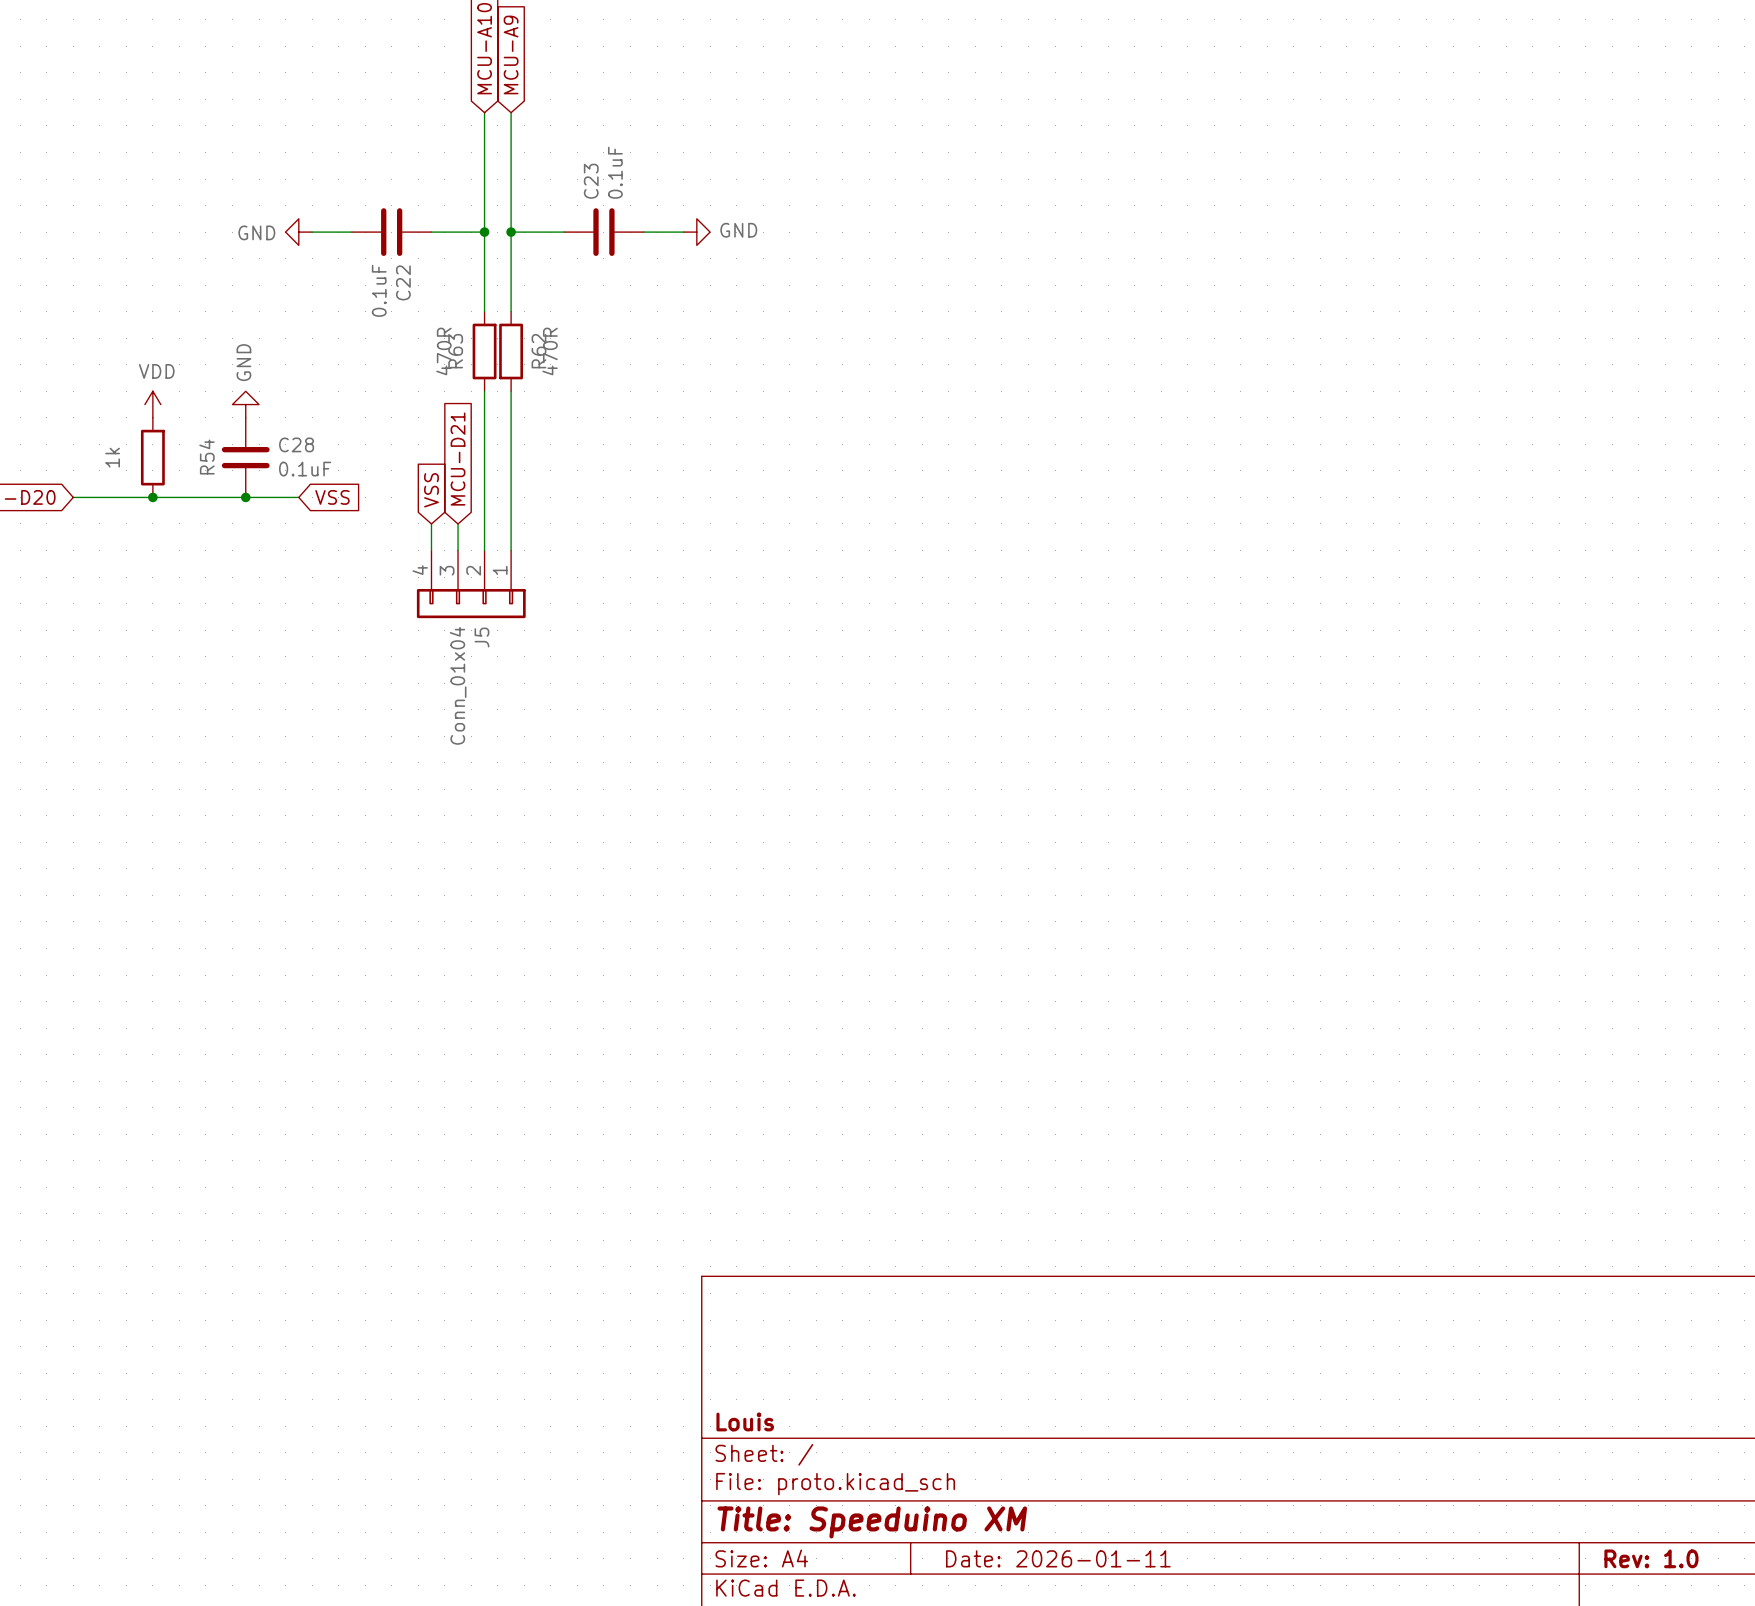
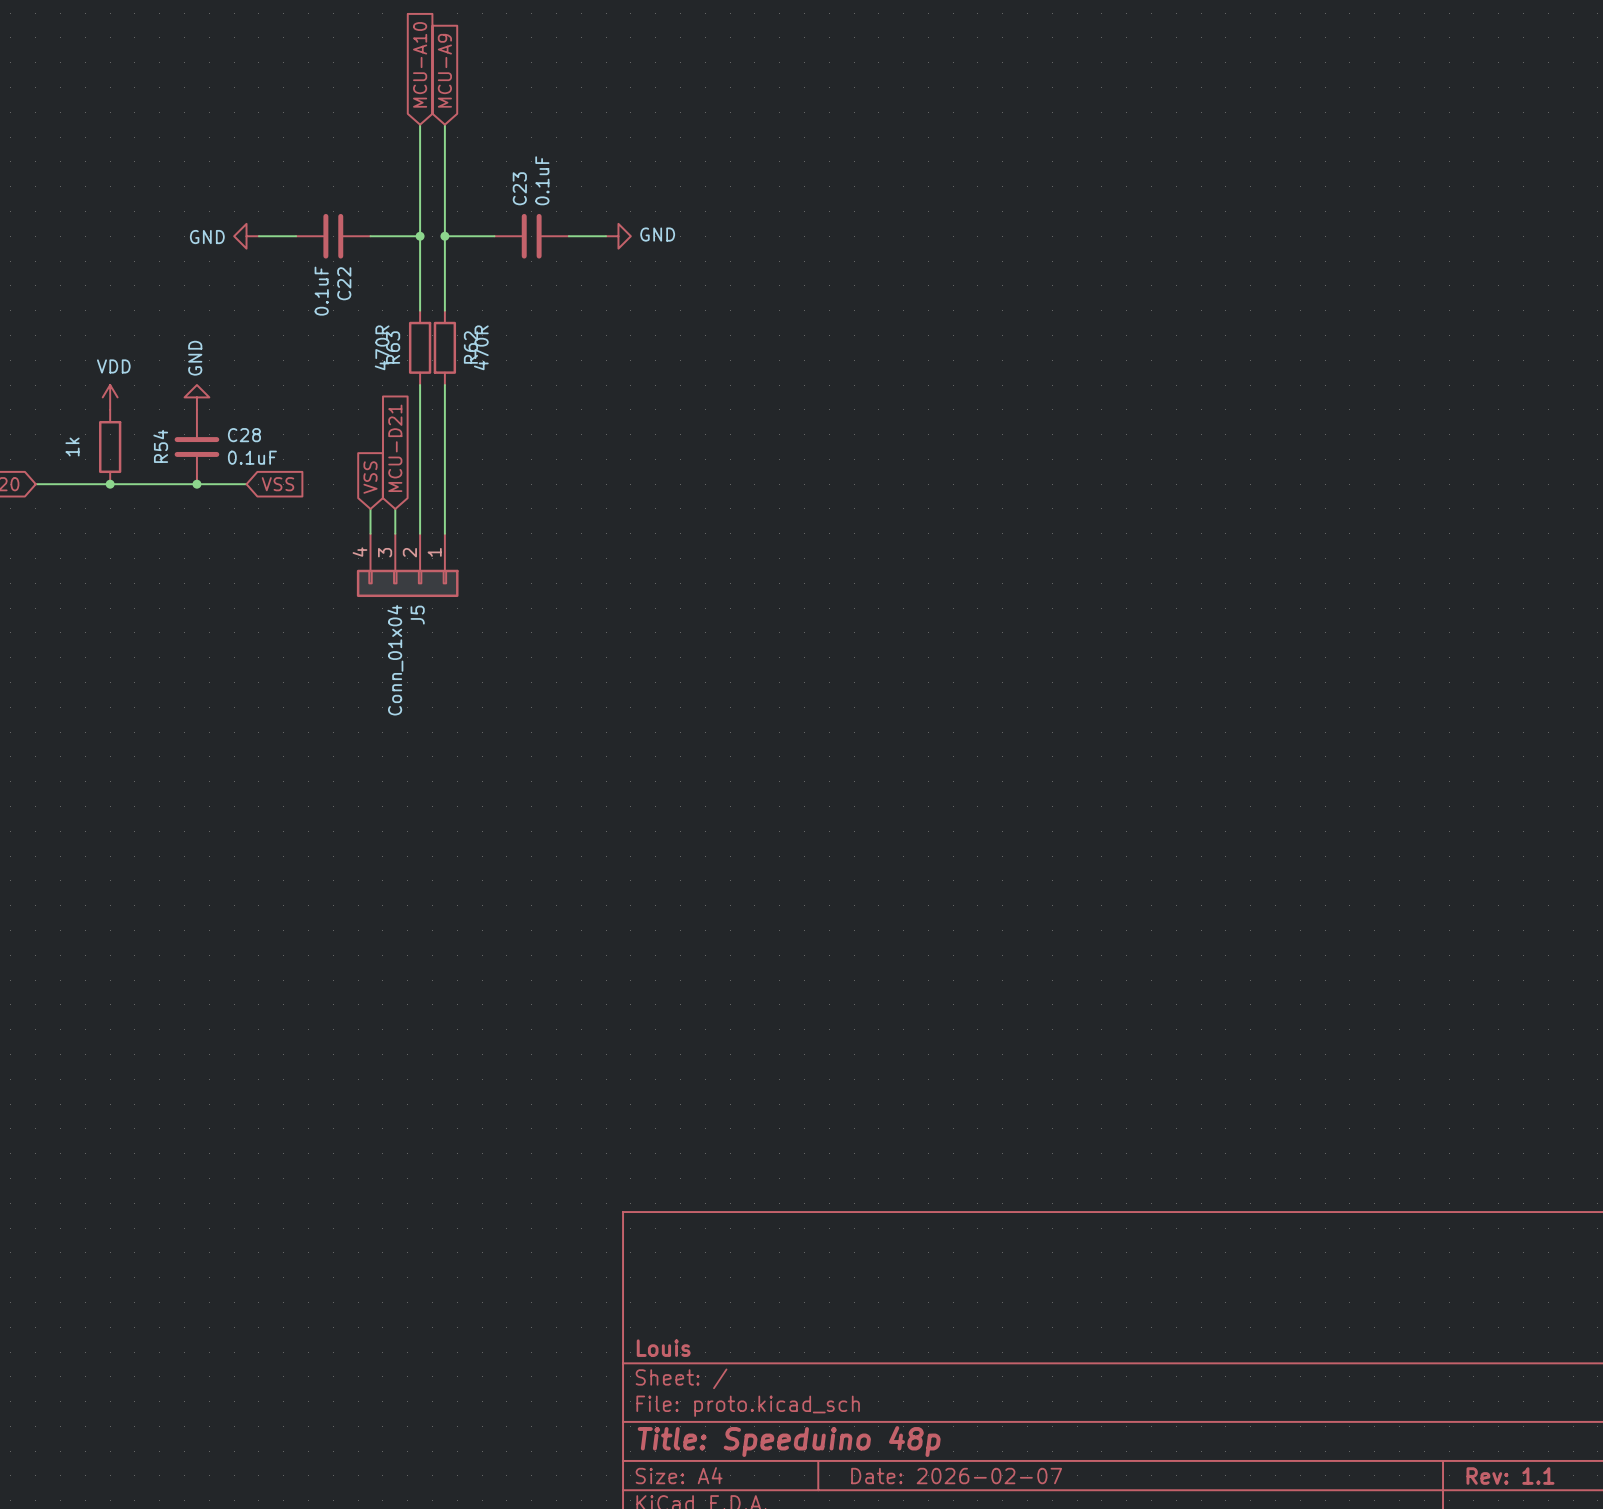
title block: Title: Speeduino XM (872, 1522) -> Title: Speeduino 48p (789, 1441)
title block: Date: 2026-01-11 (1058, 1558) -> Date: 2026-02-07 (956, 1476)
title block: Rev: 1.0 (1651, 1558) -> Rev: 1.1 (1510, 1476)

